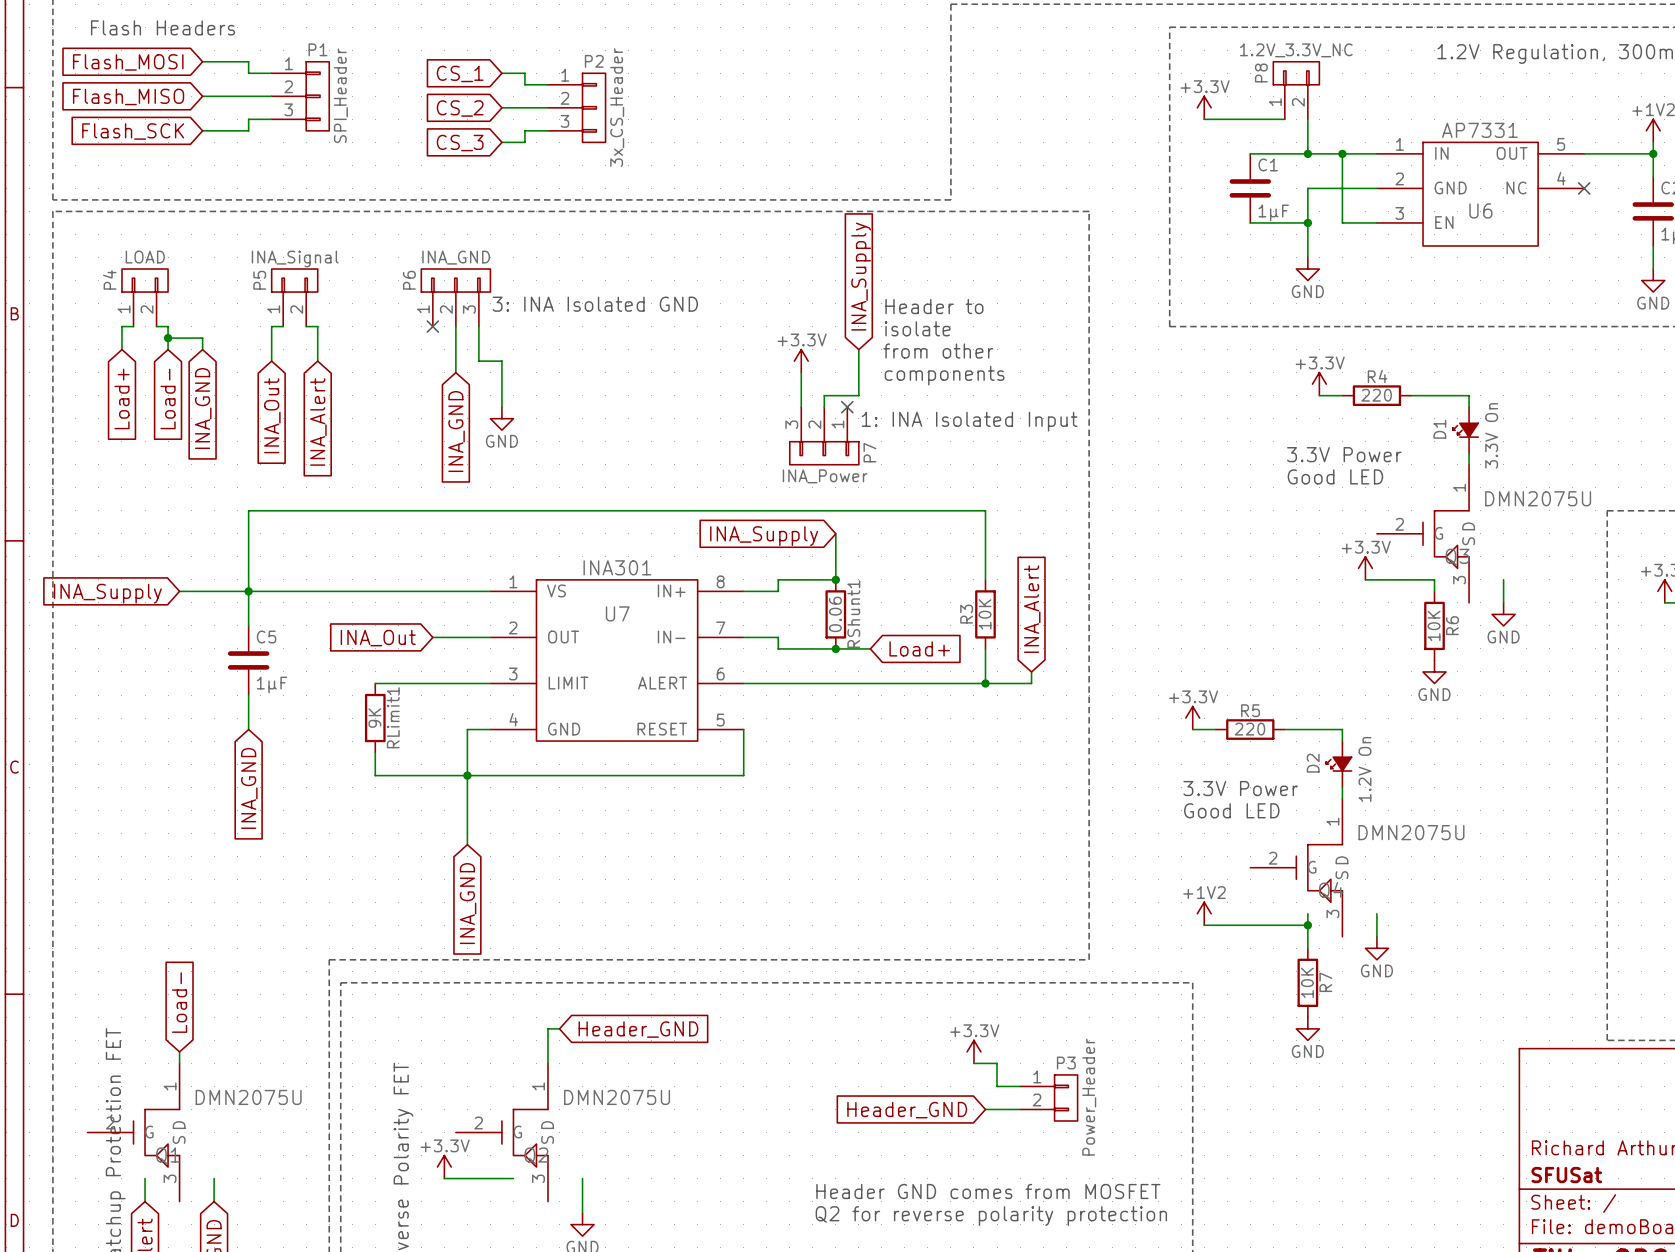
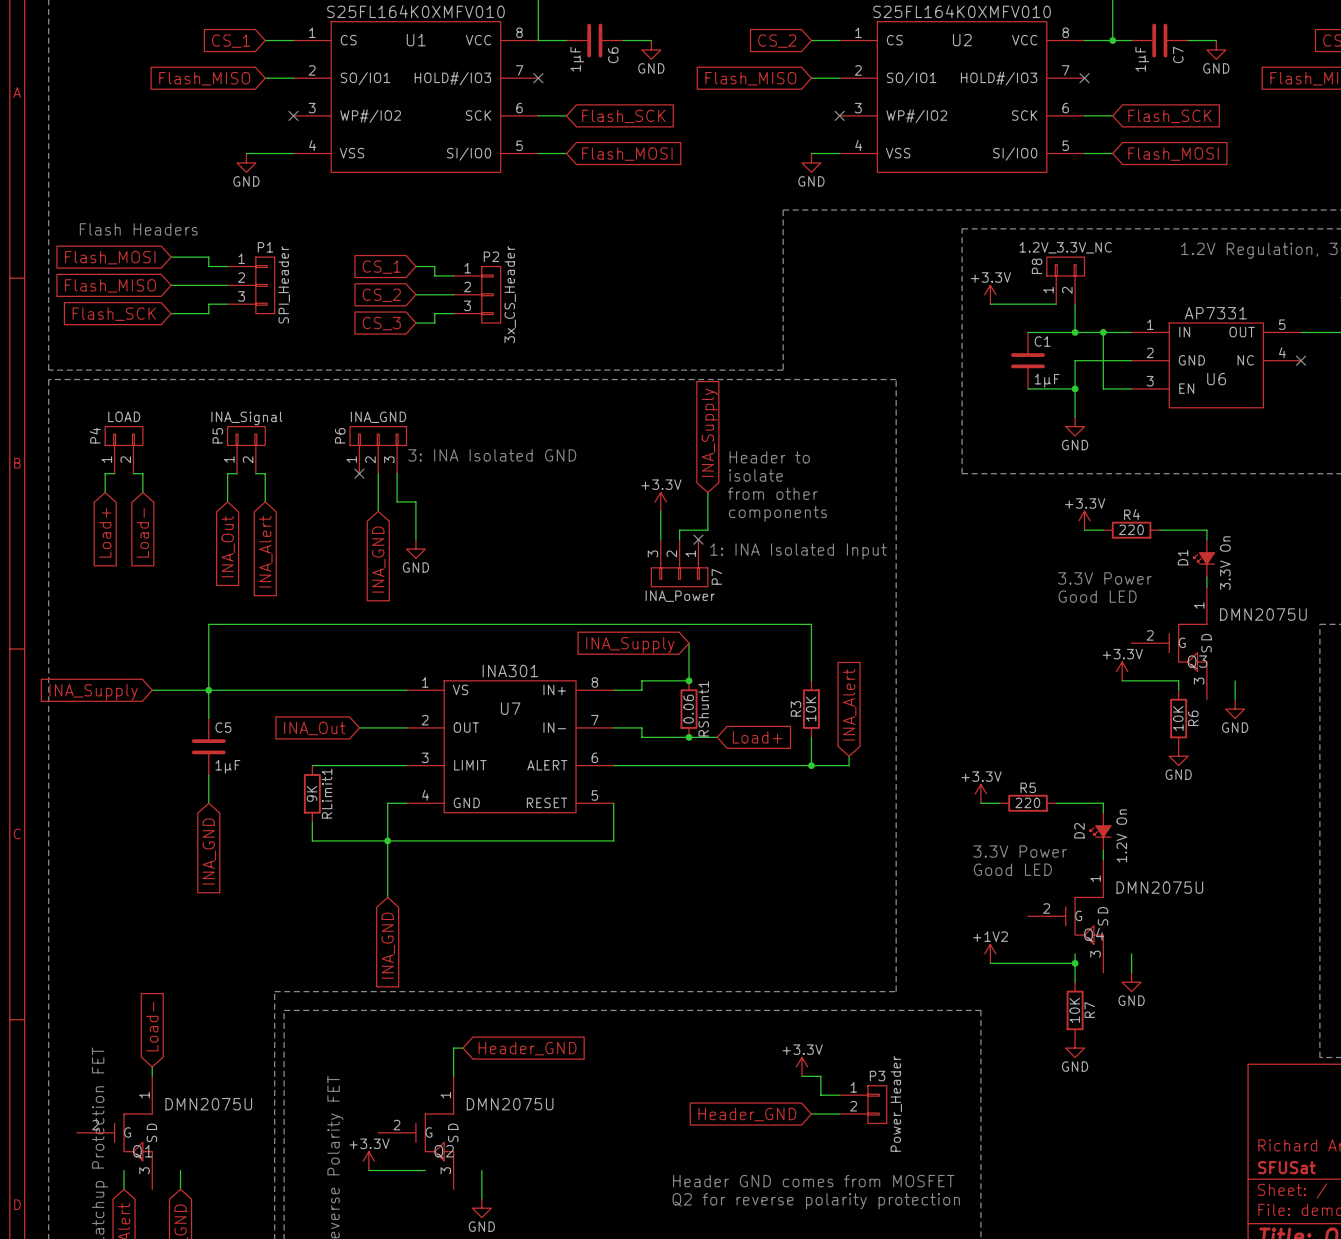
wire: (168, 338) (202, 338) (202, 349) -> none
junction: (168, 338) -> none
global label: INA_GND (203, 408) -> none

